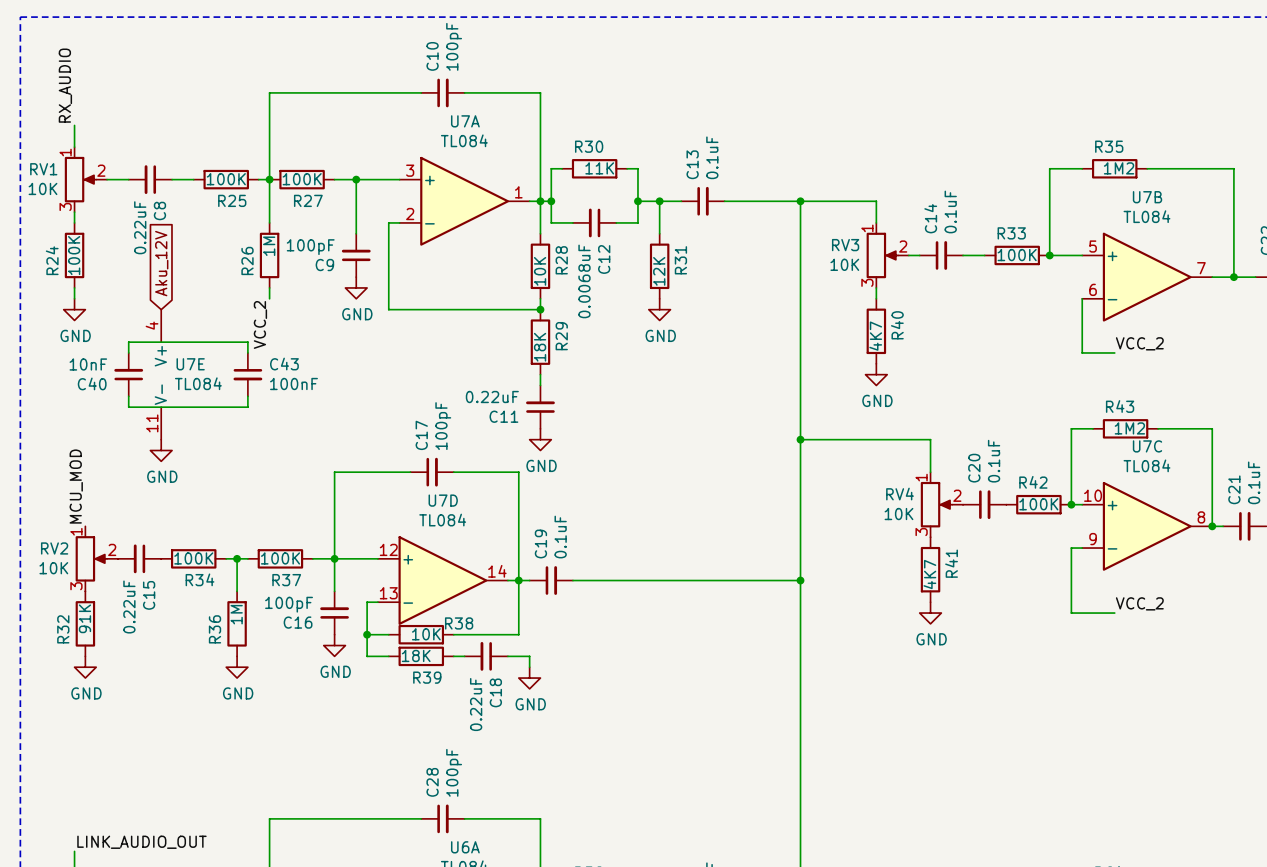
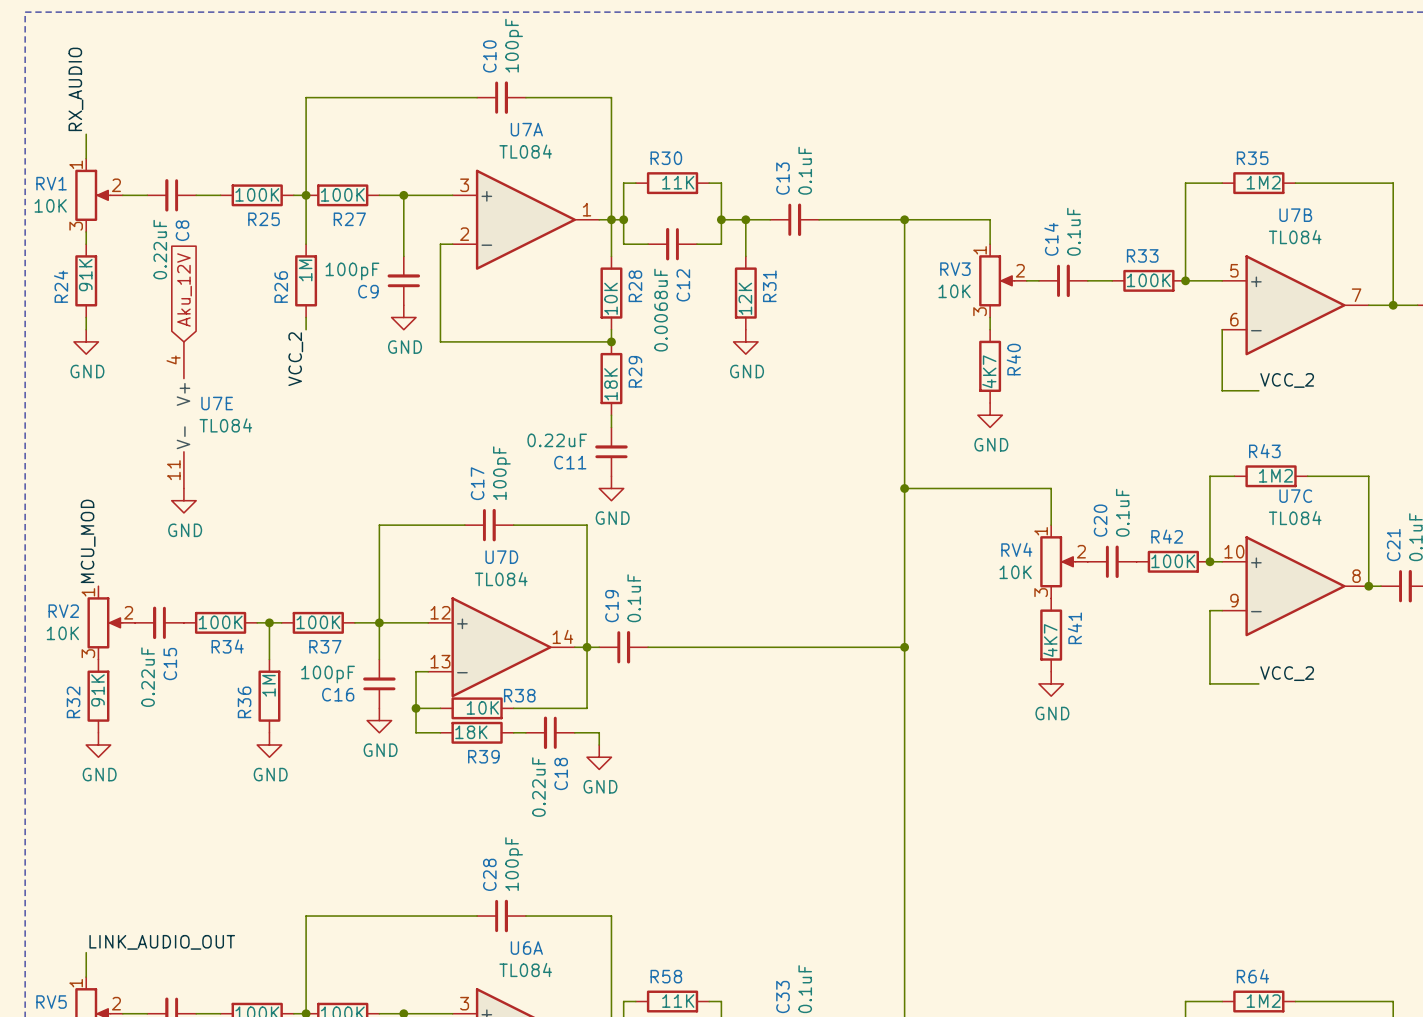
R24 value: 100K (74, 255) -> 91K (85, 275)
wire: (128, 352) (128, 342) (247, 342) (247, 352) -> none
C40: 10nF (128, 374) -> none
C43: 100nF (247, 374) -> none
wire: (128, 396) (128, 407) (247, 407) (247, 396) -> none

